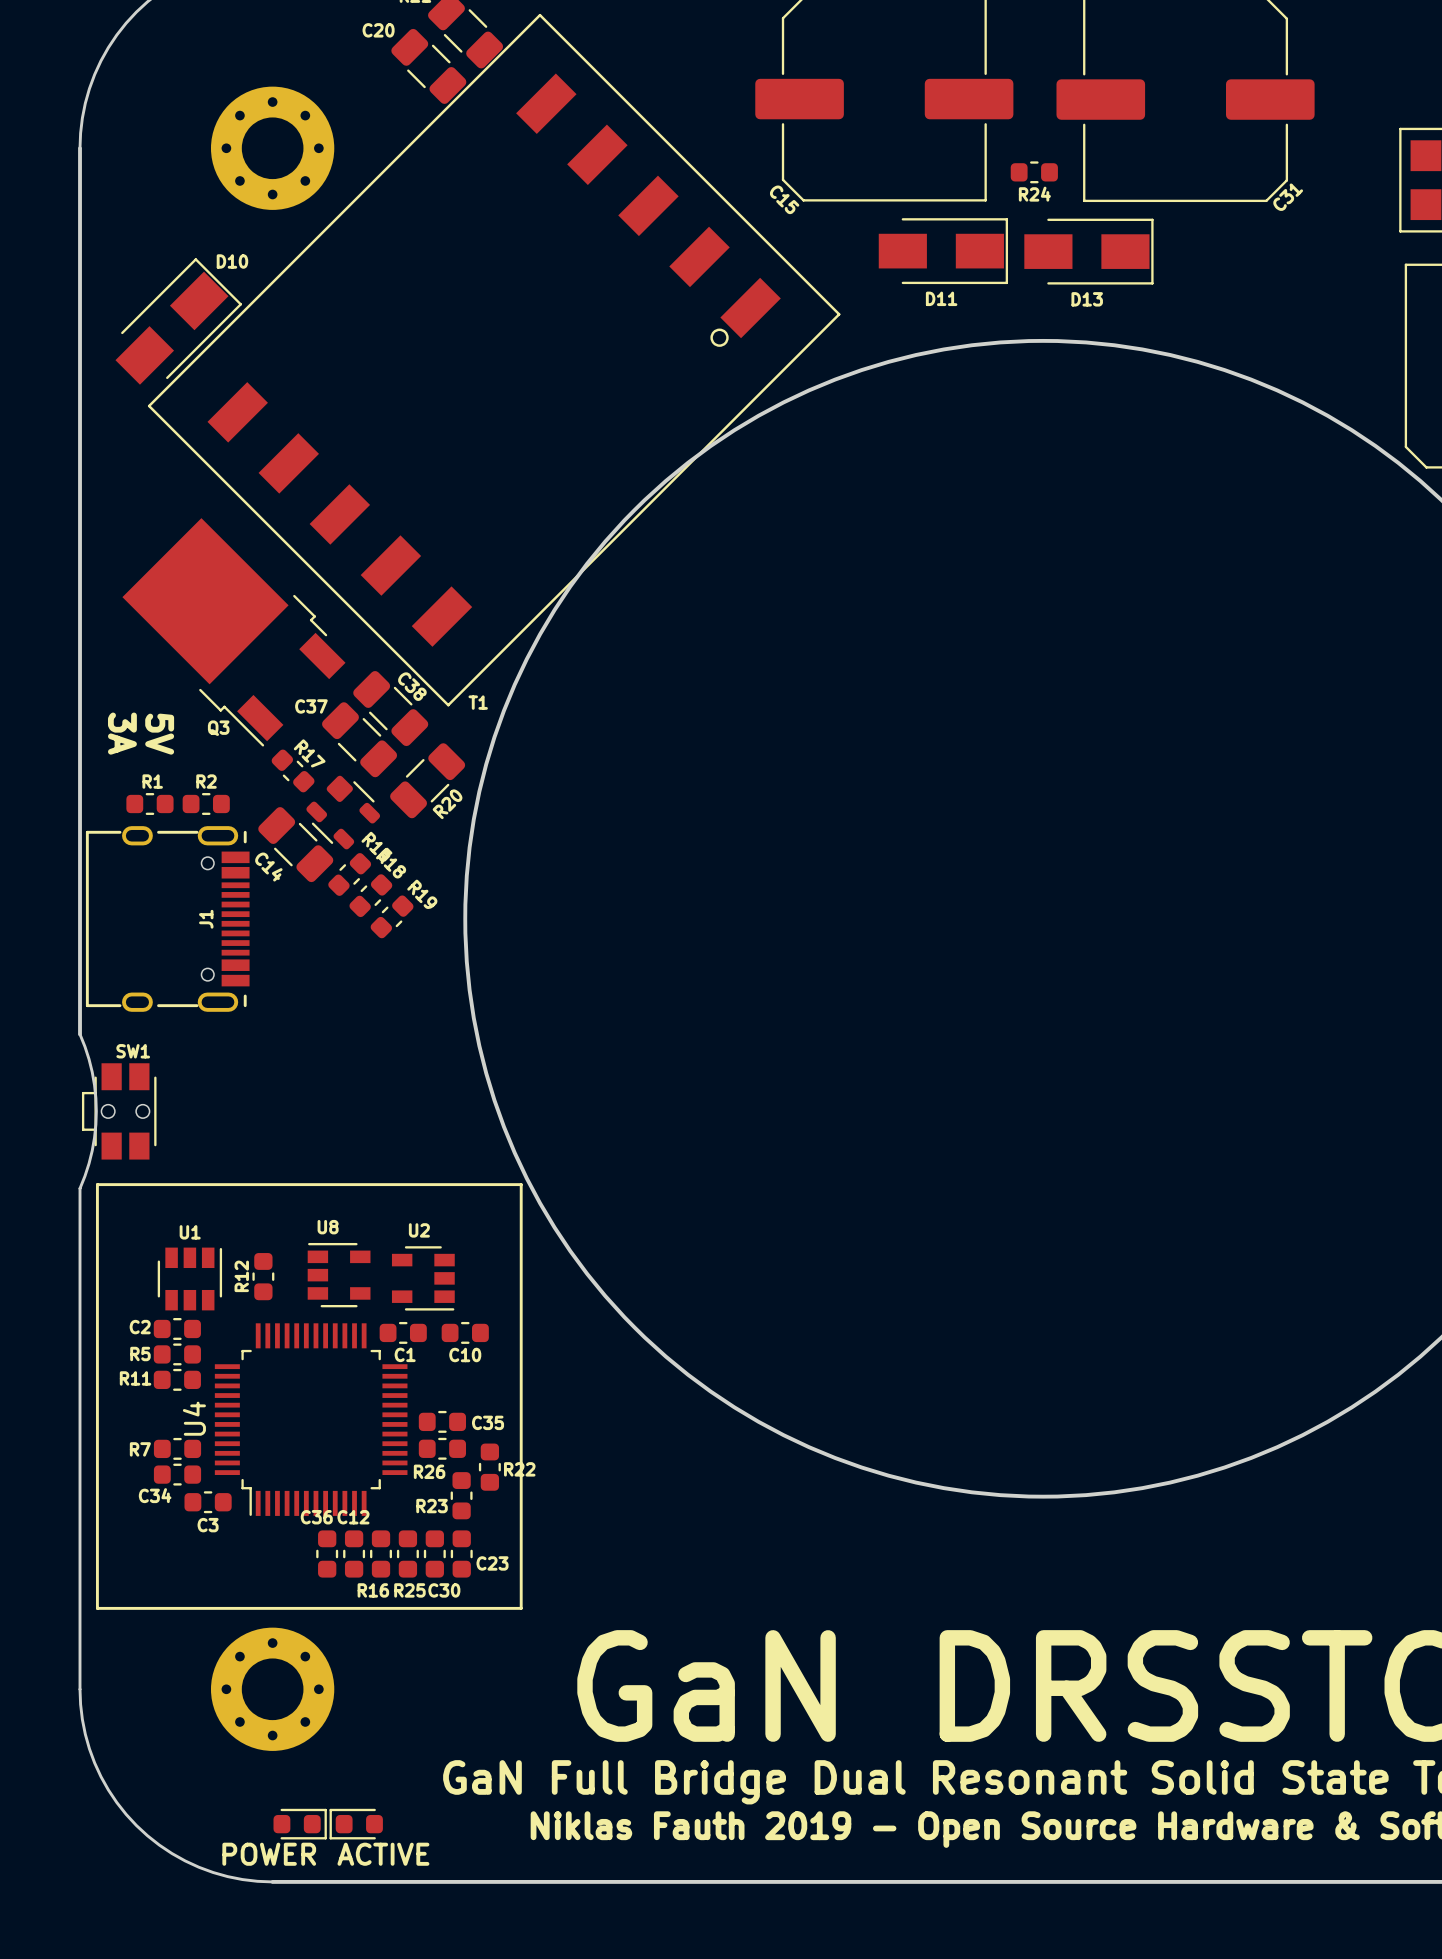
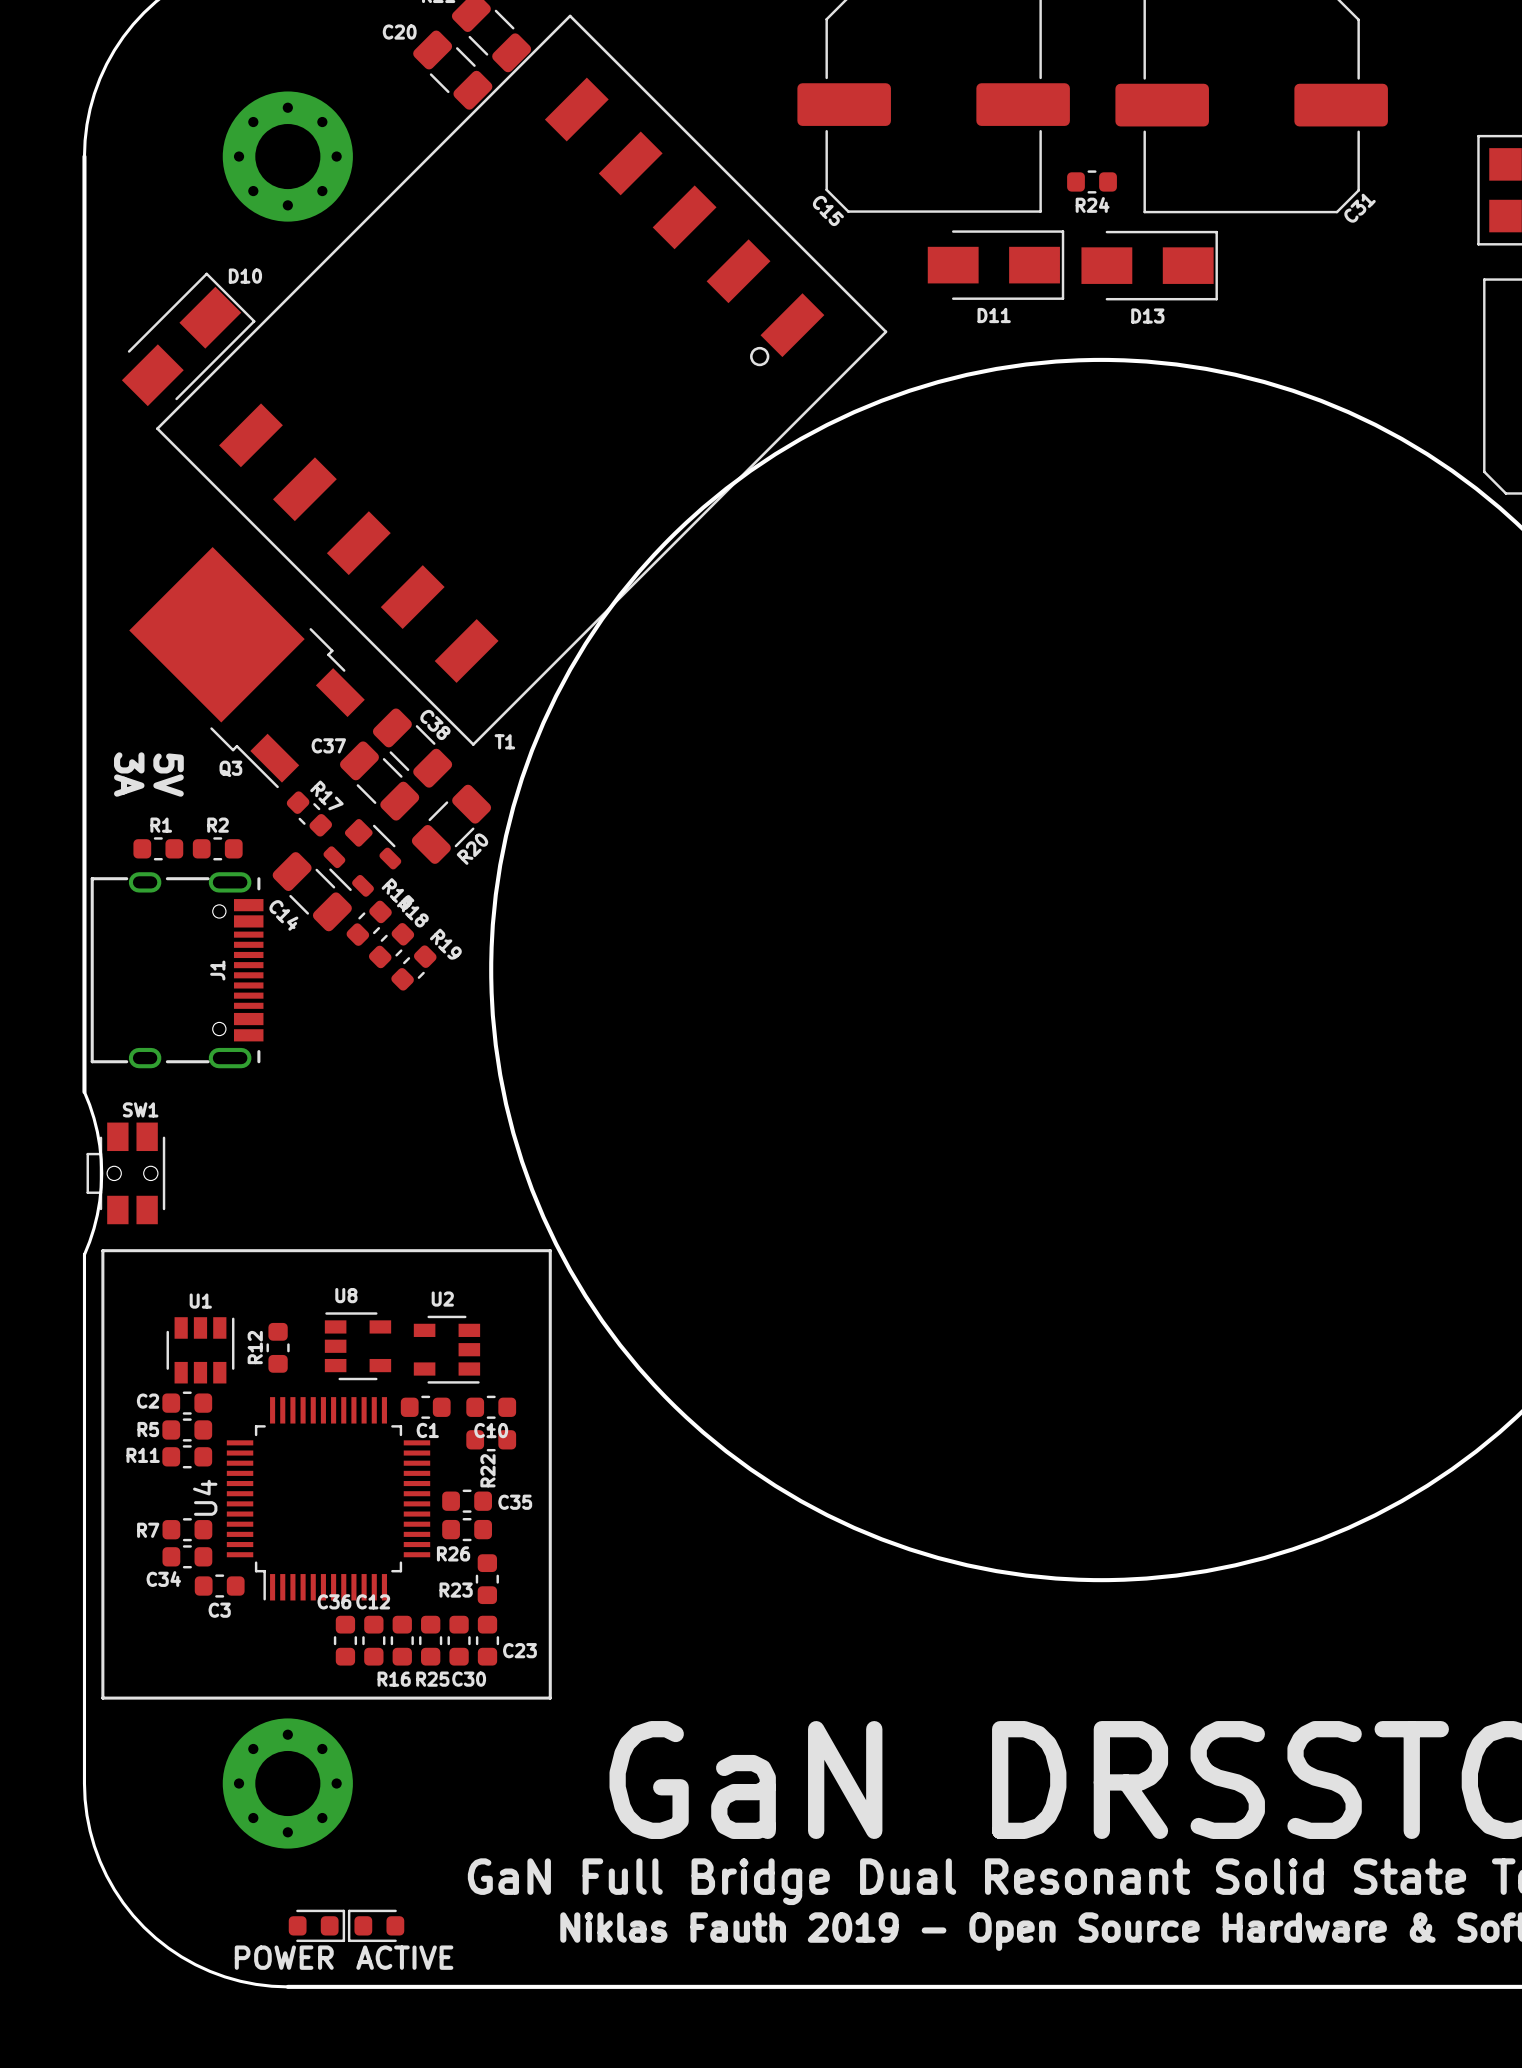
R22 rotation: 0° (489, 1467) -> 90° clockwise (491, 1439)
R22 position: (489, 1467) -> (491, 1439)

